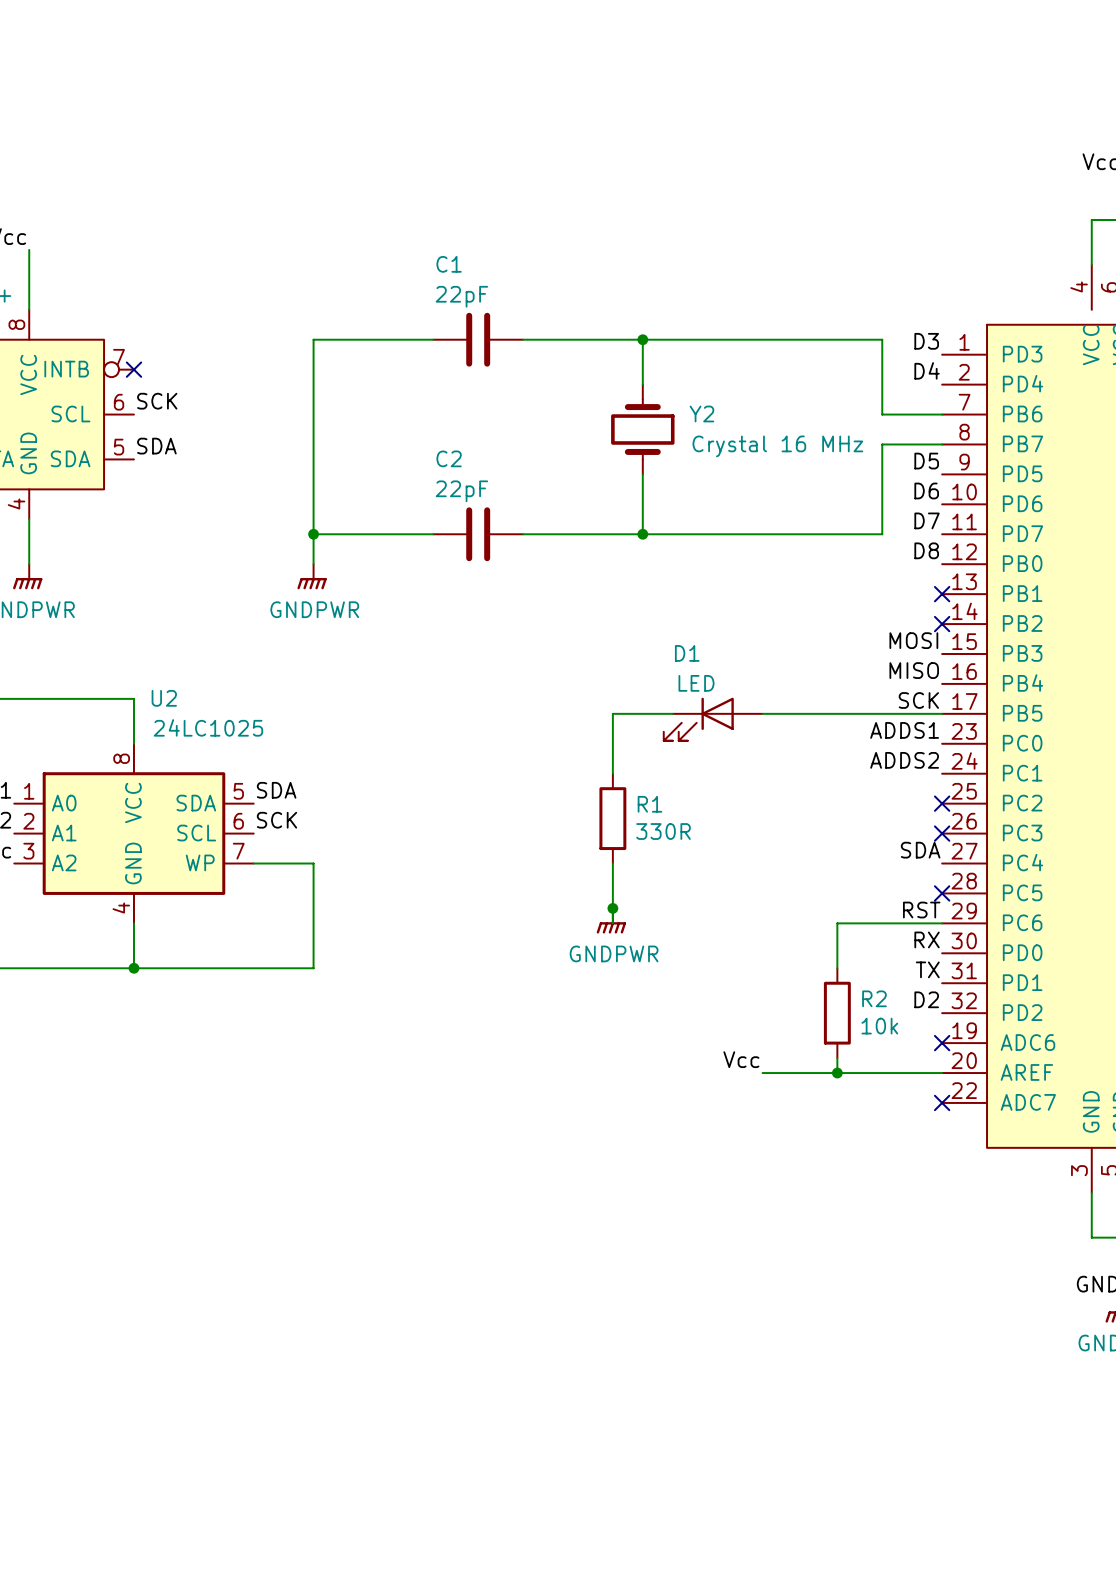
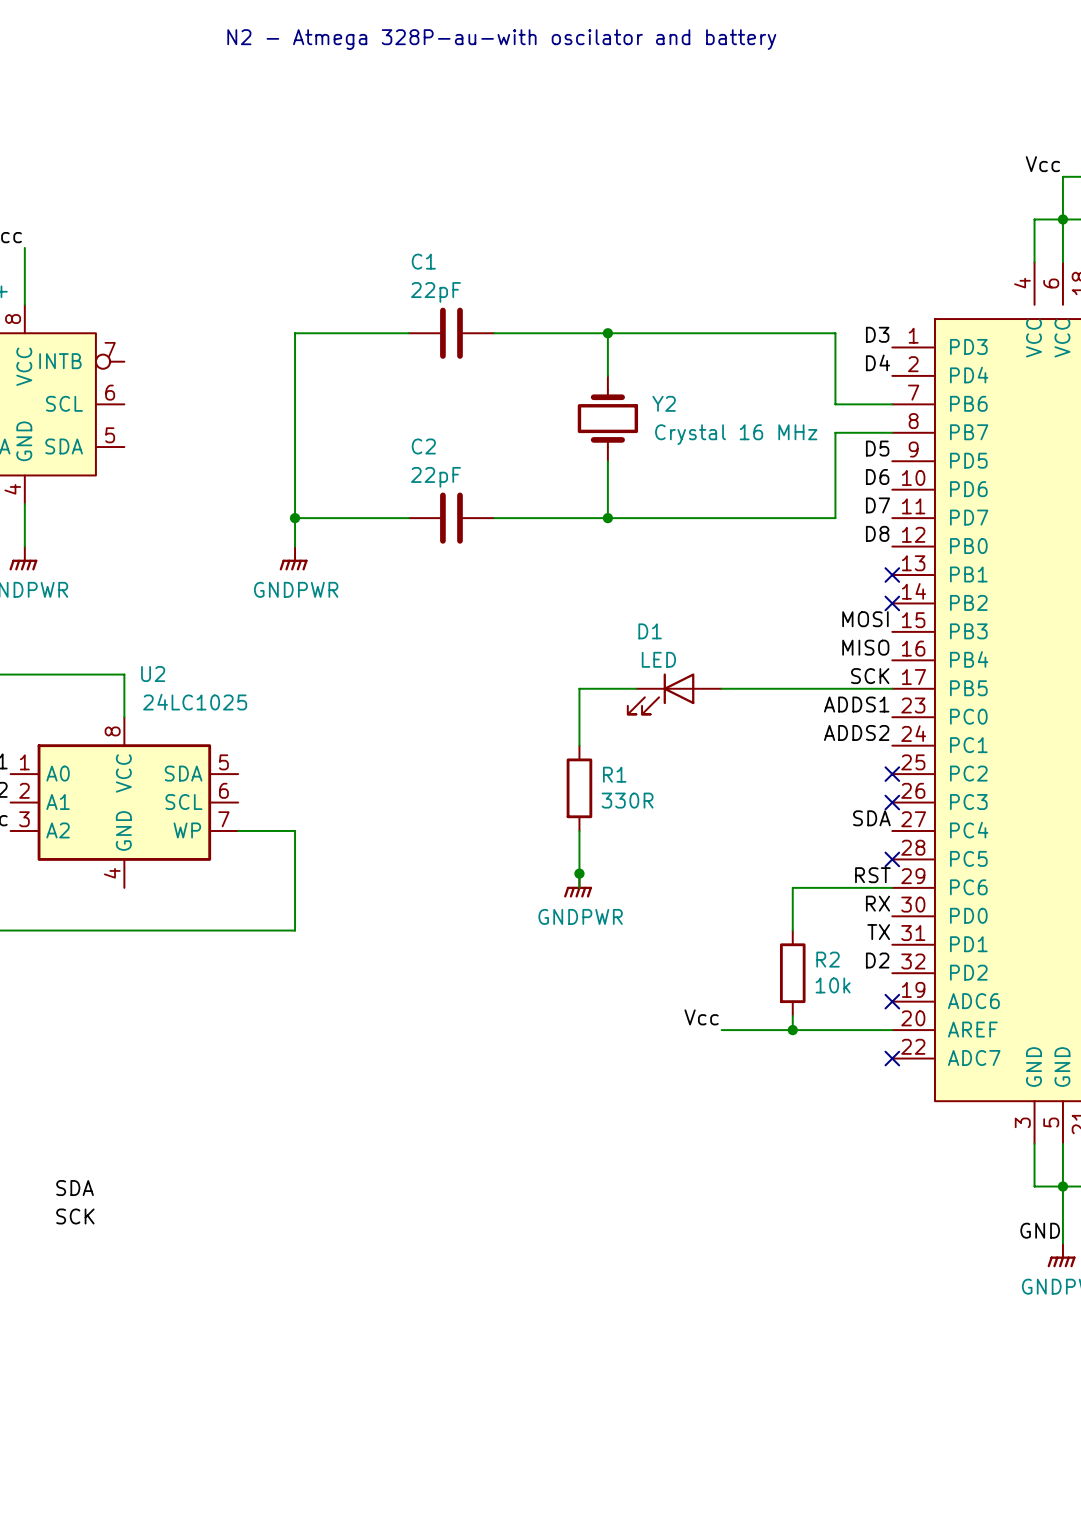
text: none -> N2 - Atmega 328P-au-with oscilator and battery (501, 39)
no-connect mark: (133, 369) -> none
label: SCK (157, 401) -> none
label: SDA (156, 446) -> none
label: SDA (276, 790) -> none
label: SCK (276, 820) -> none
wire: (133, 923) (133, 968) -> none
junction: (133, 968) -> none
label: none -> SDA (75, 1188)
label: none -> SCK (75, 1216)

